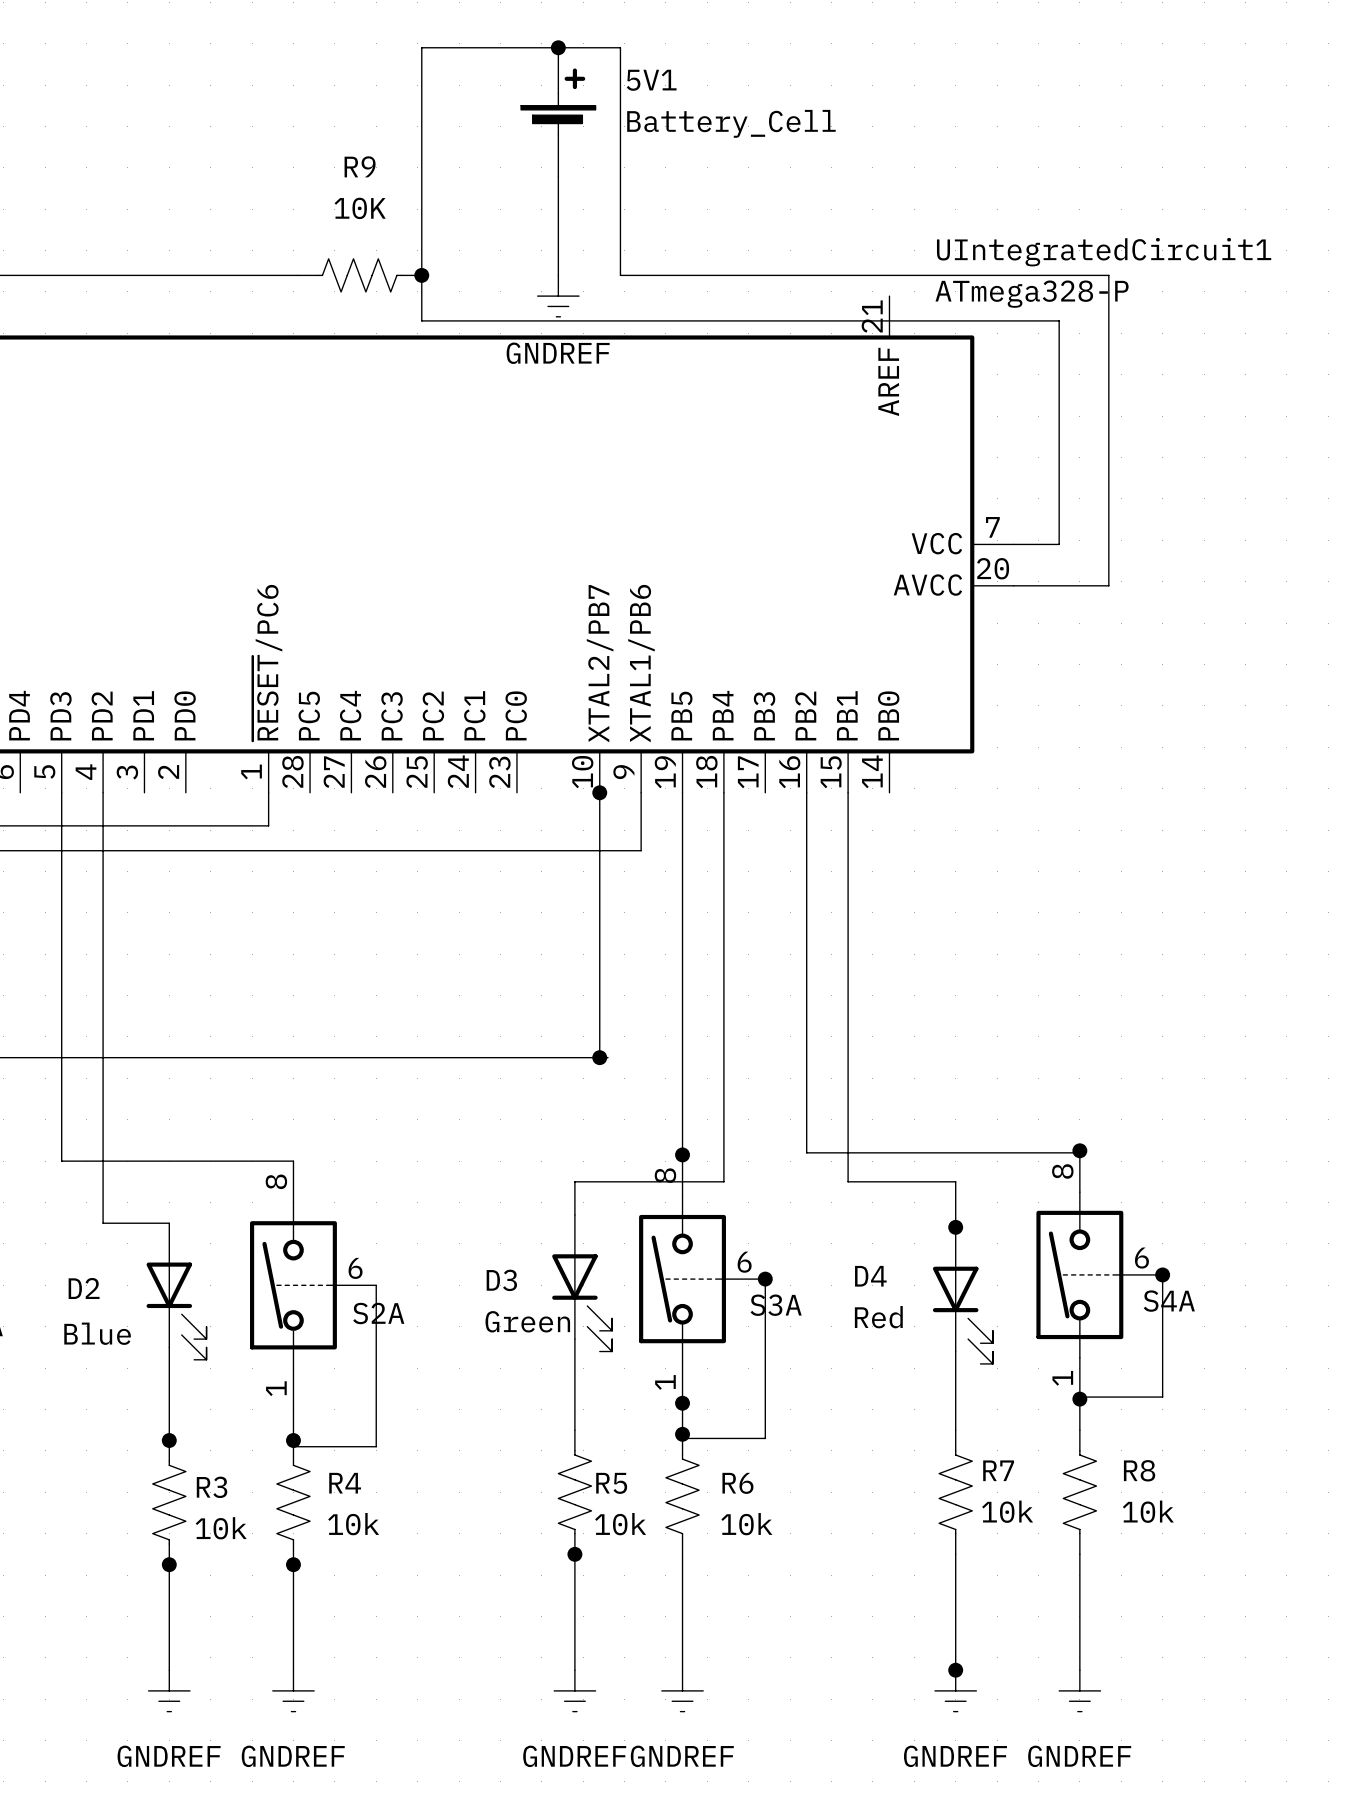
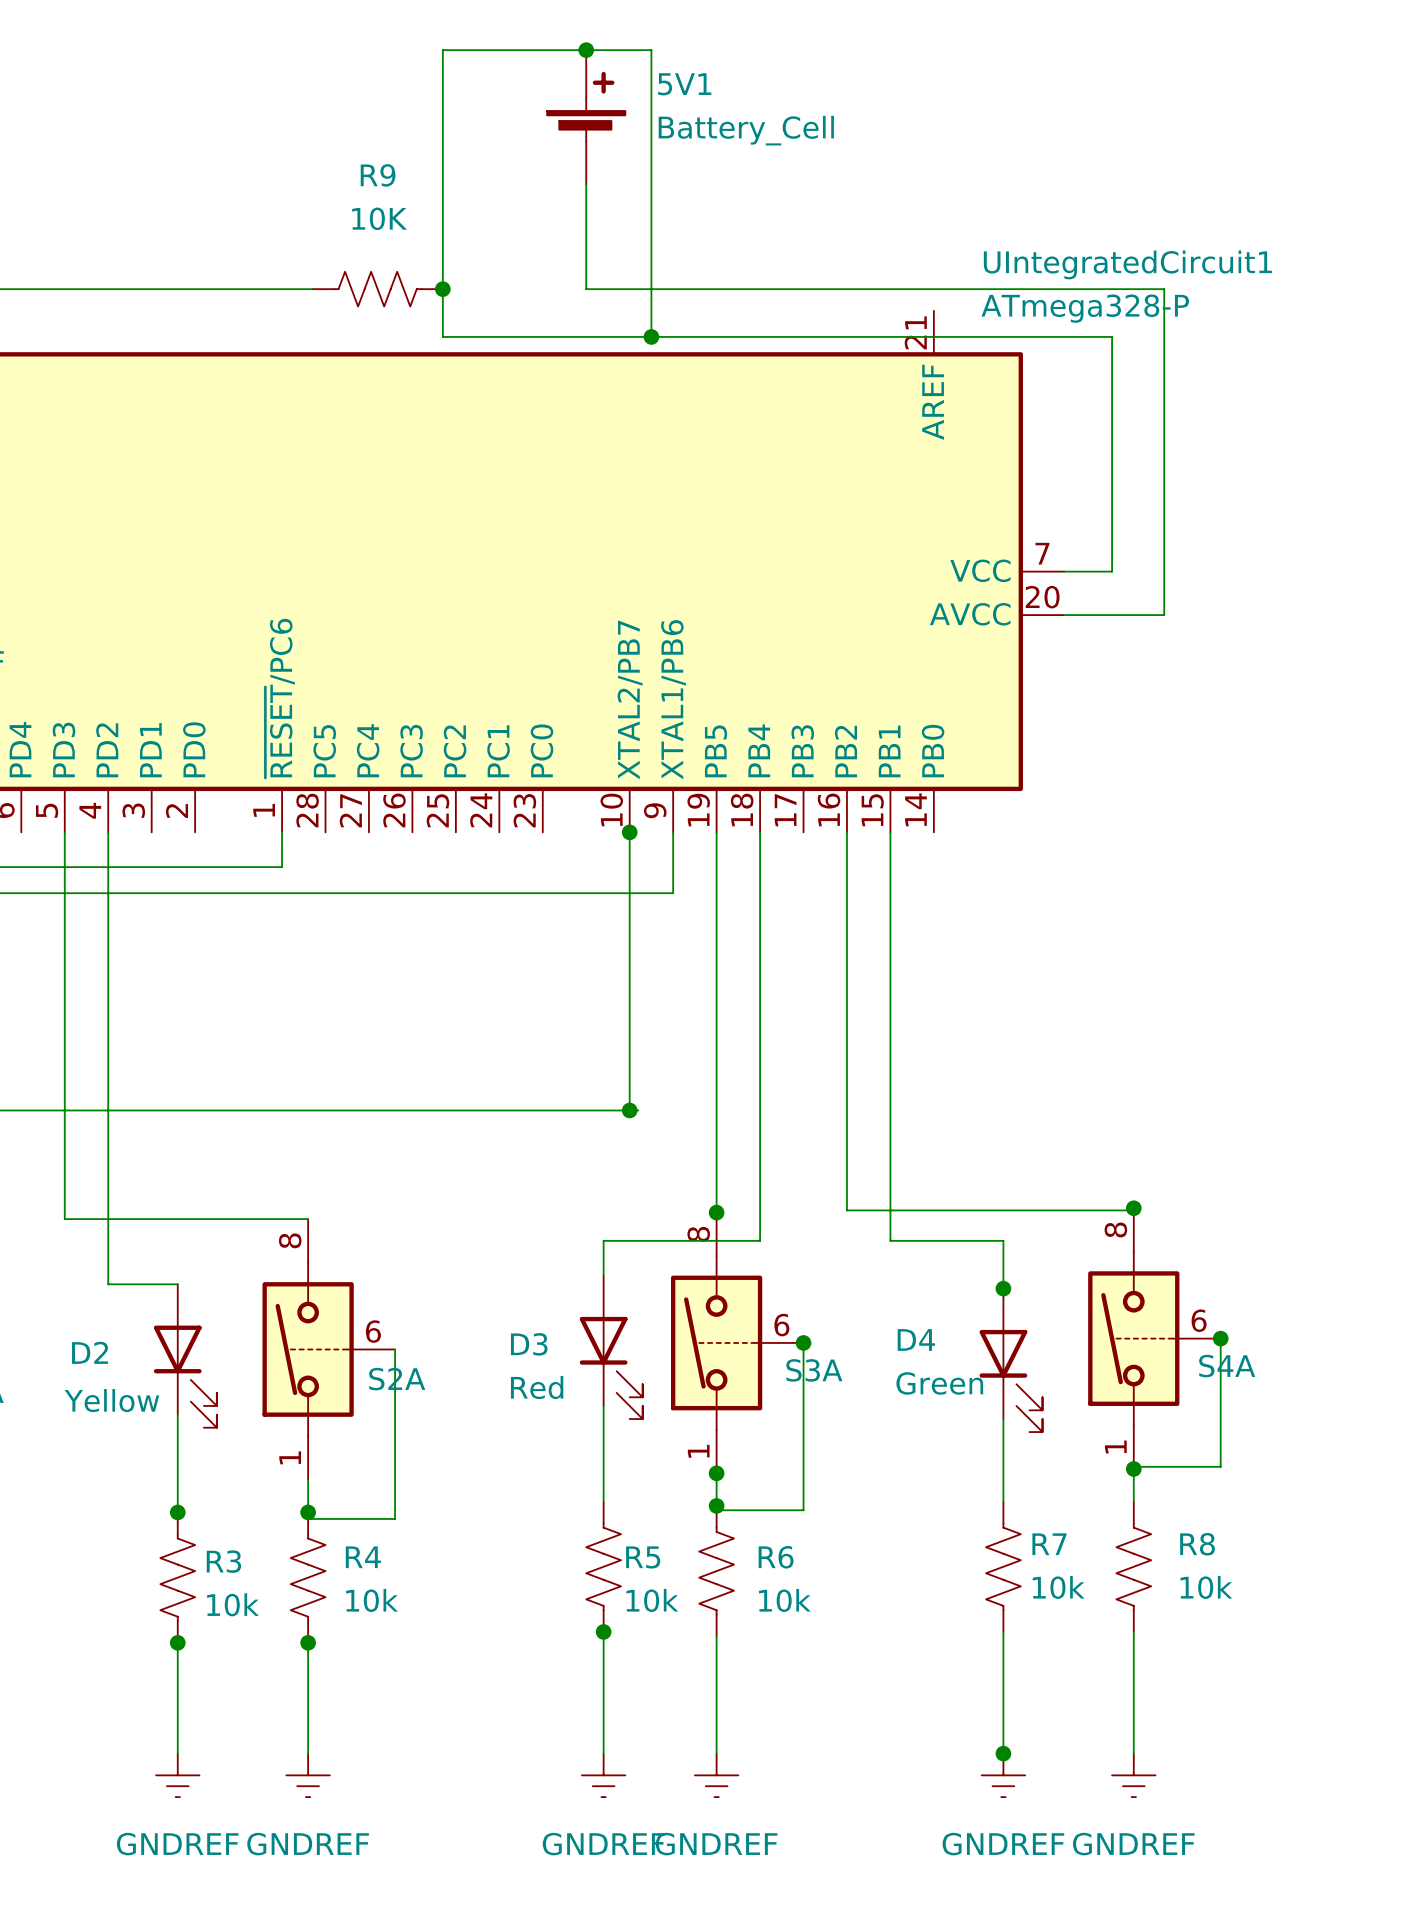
wire: none -> (586, 289) (651, 289) (651, 336)
power symbol: GNDREF (558, 296) -> none
junction: none -> (651, 336)
D4 value: Red (878, 1317) -> Green (939, 1383)
D3 value: Green (527, 1321) -> Red (537, 1387)
D2 value: Blue (97, 1333) -> Yellow (111, 1400)

